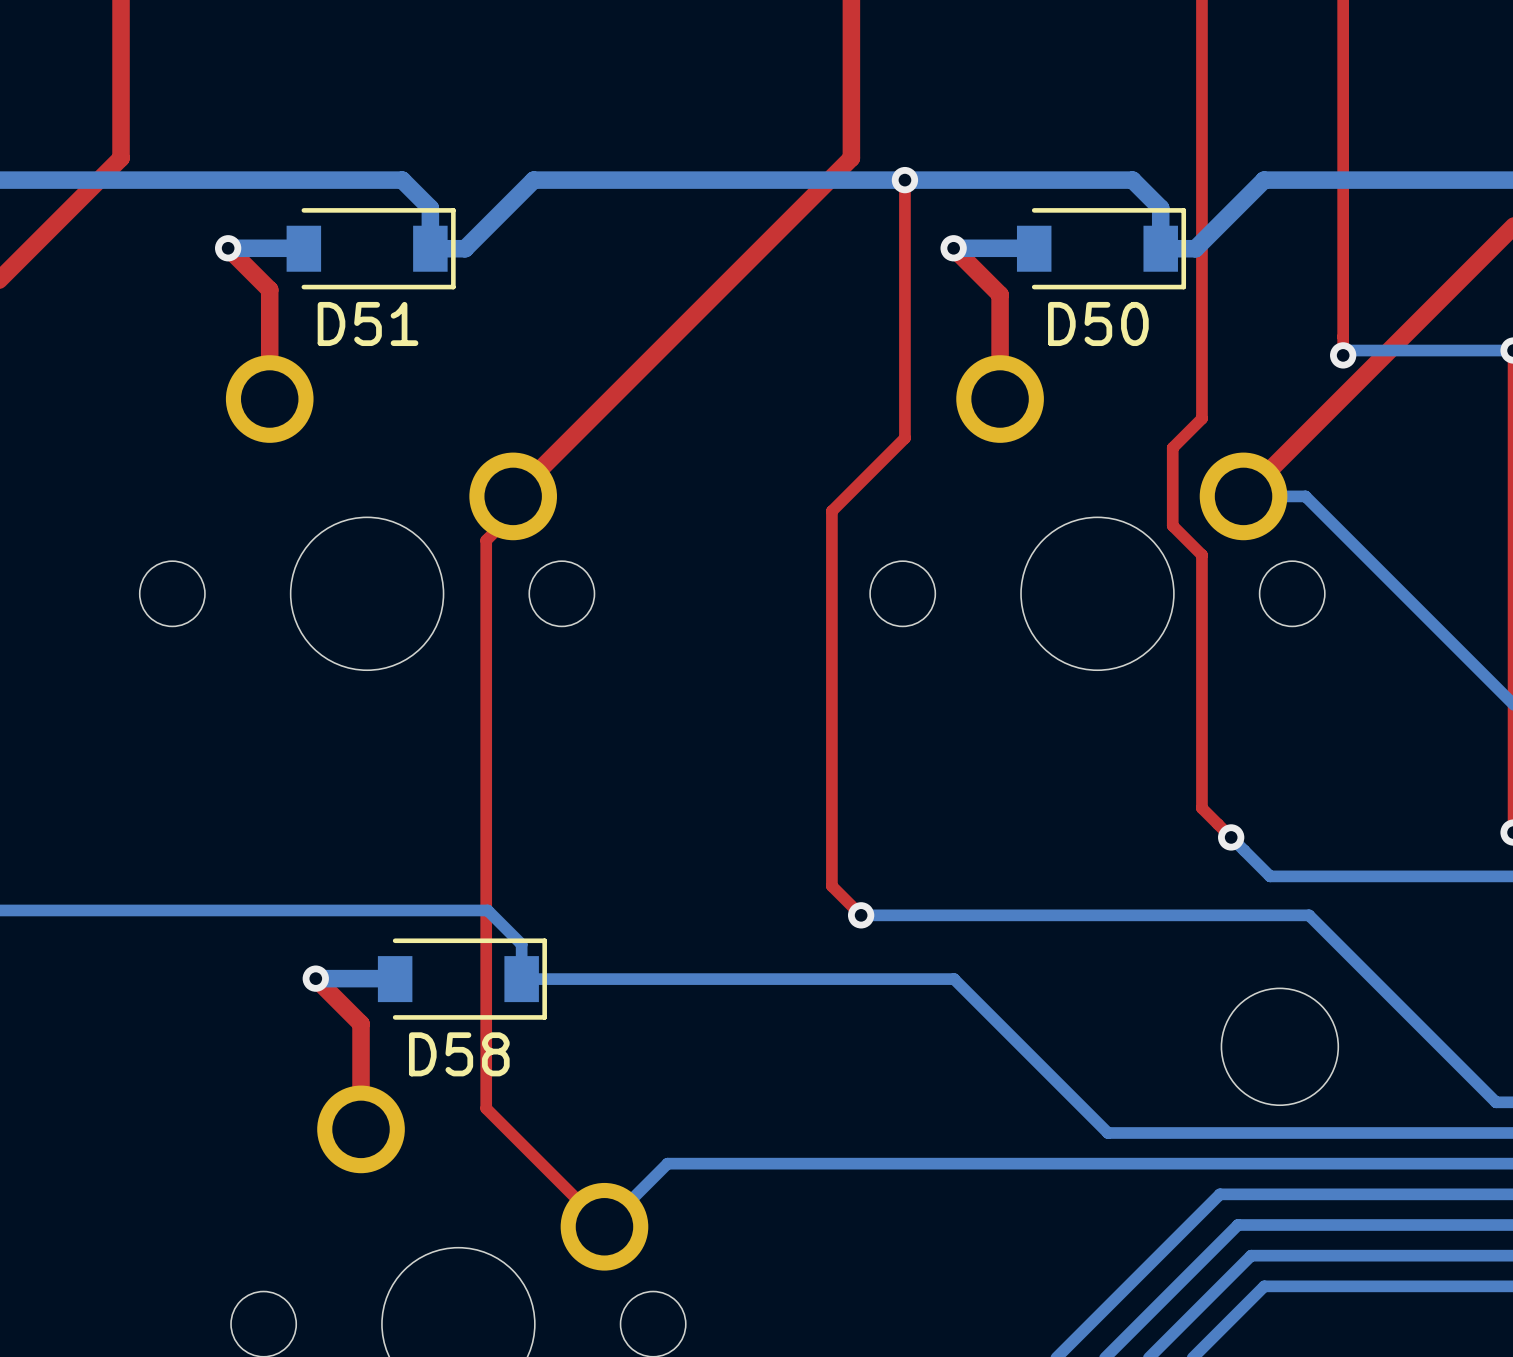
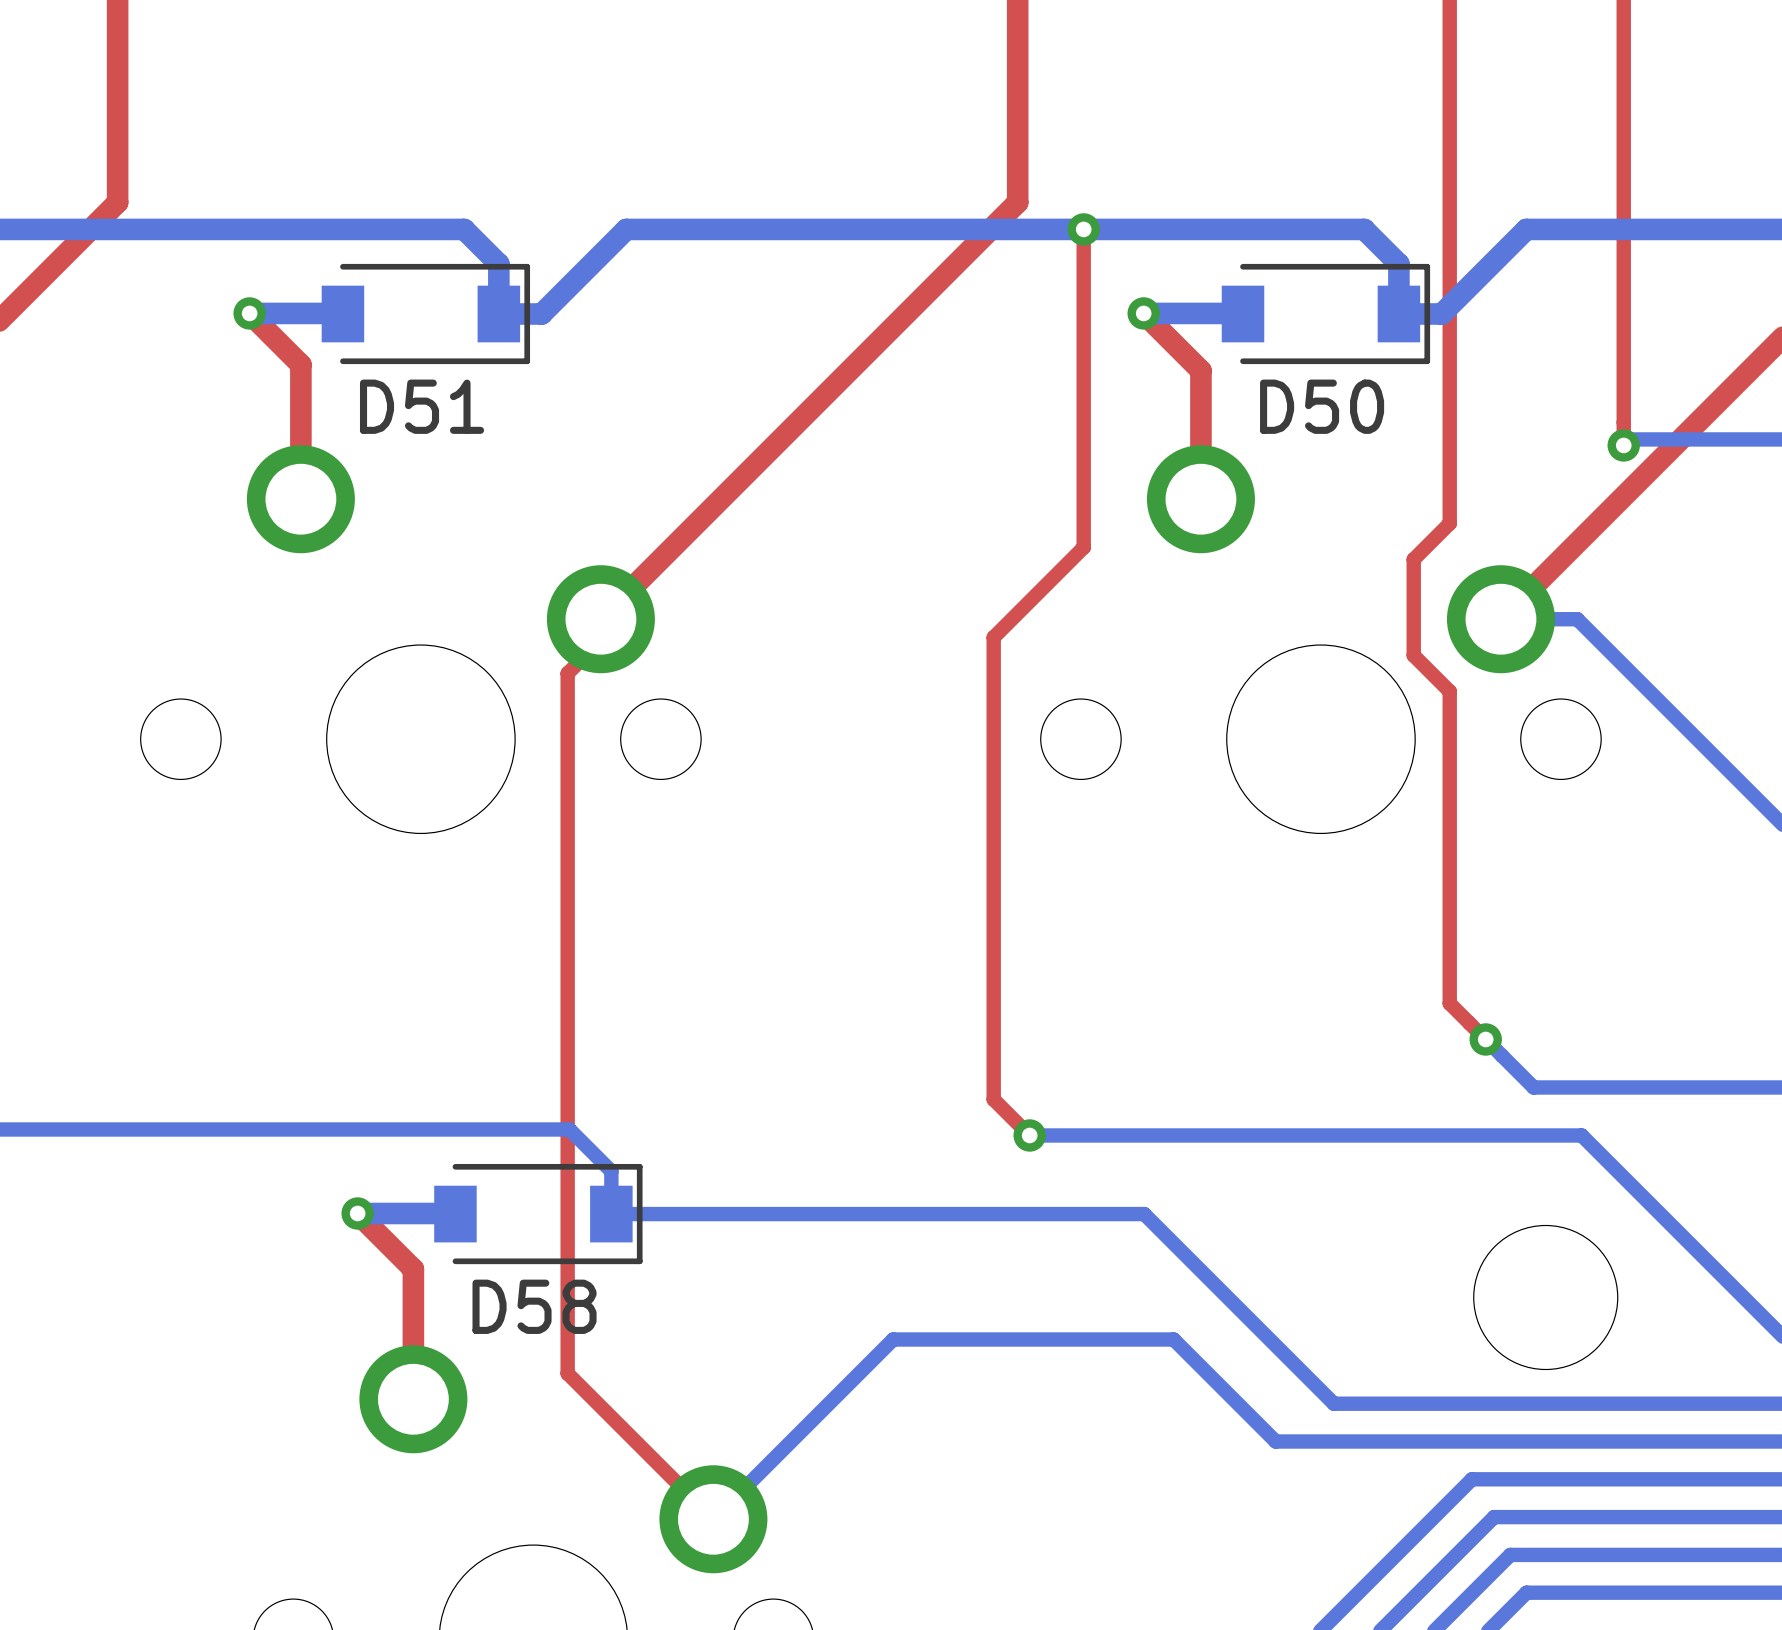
bottom track: (1060, 1163) (667, 1163) -> (1275, 1441) (1173, 1339) (893, 1339) (791, 1441)

